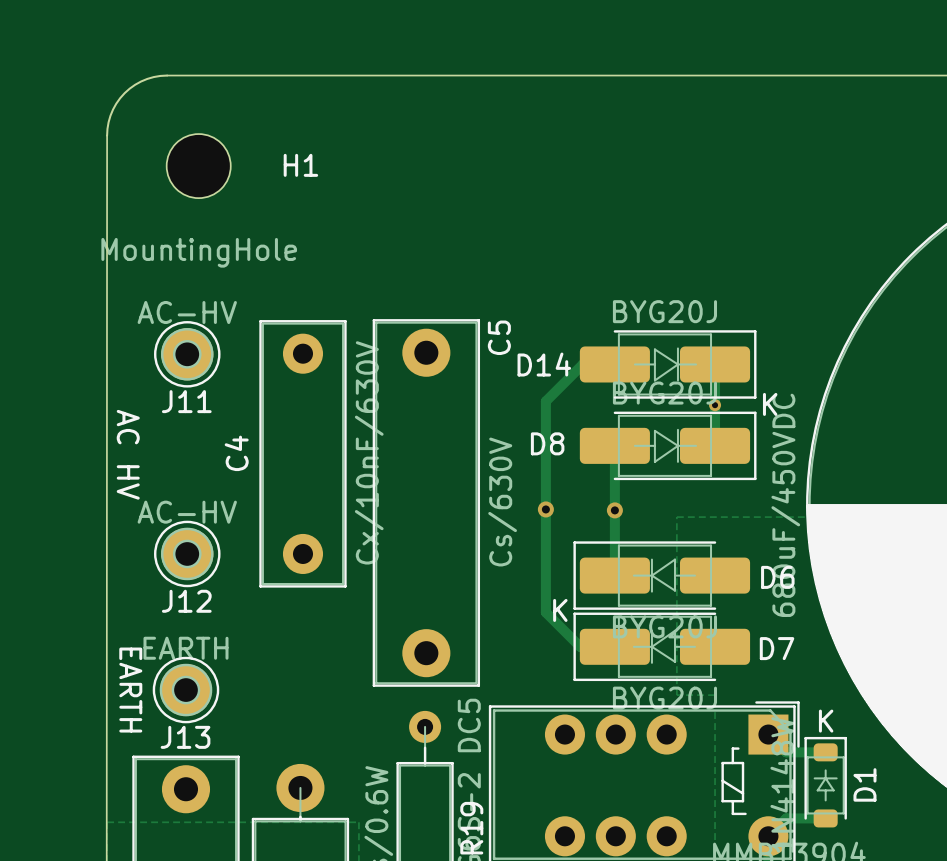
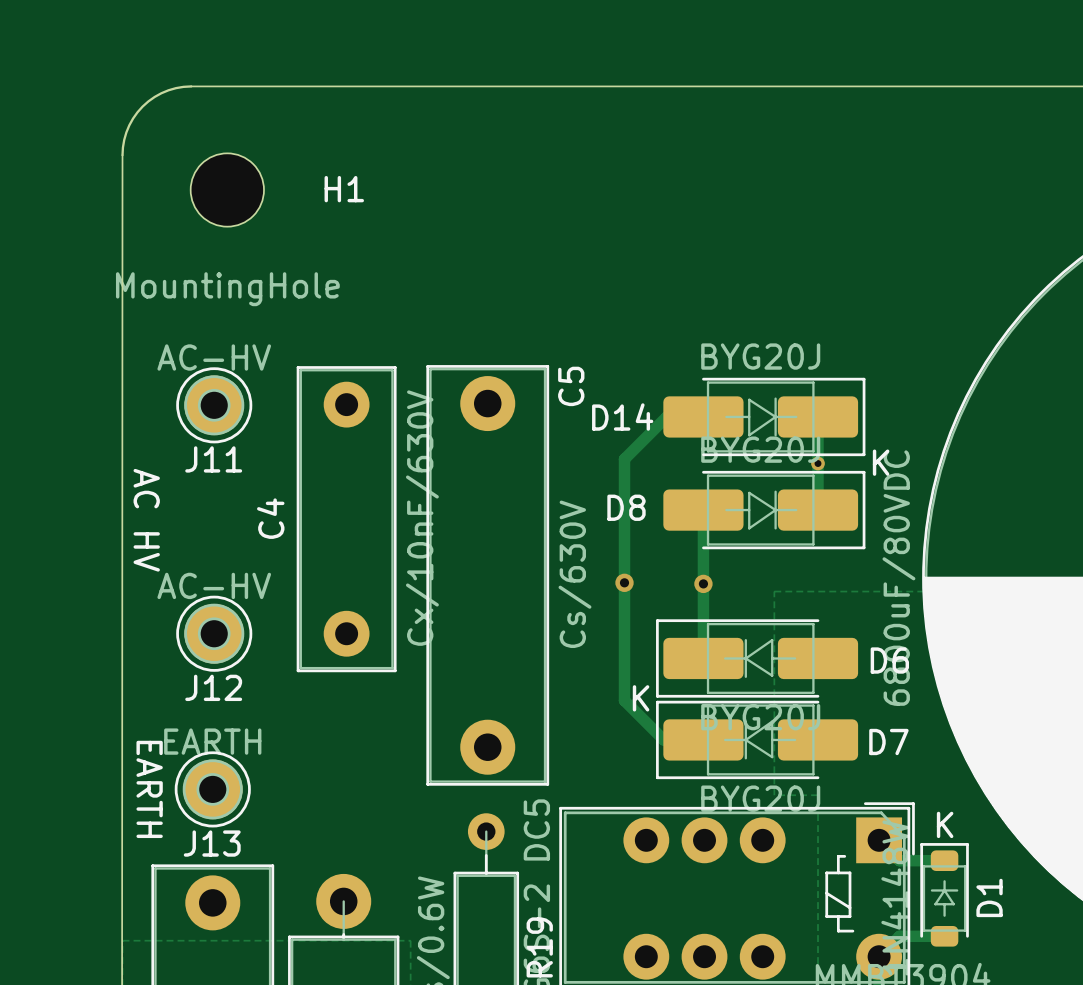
part value: 680uF/450VDC (785, 505) -> 6800uF/80VDC (898, 578)

